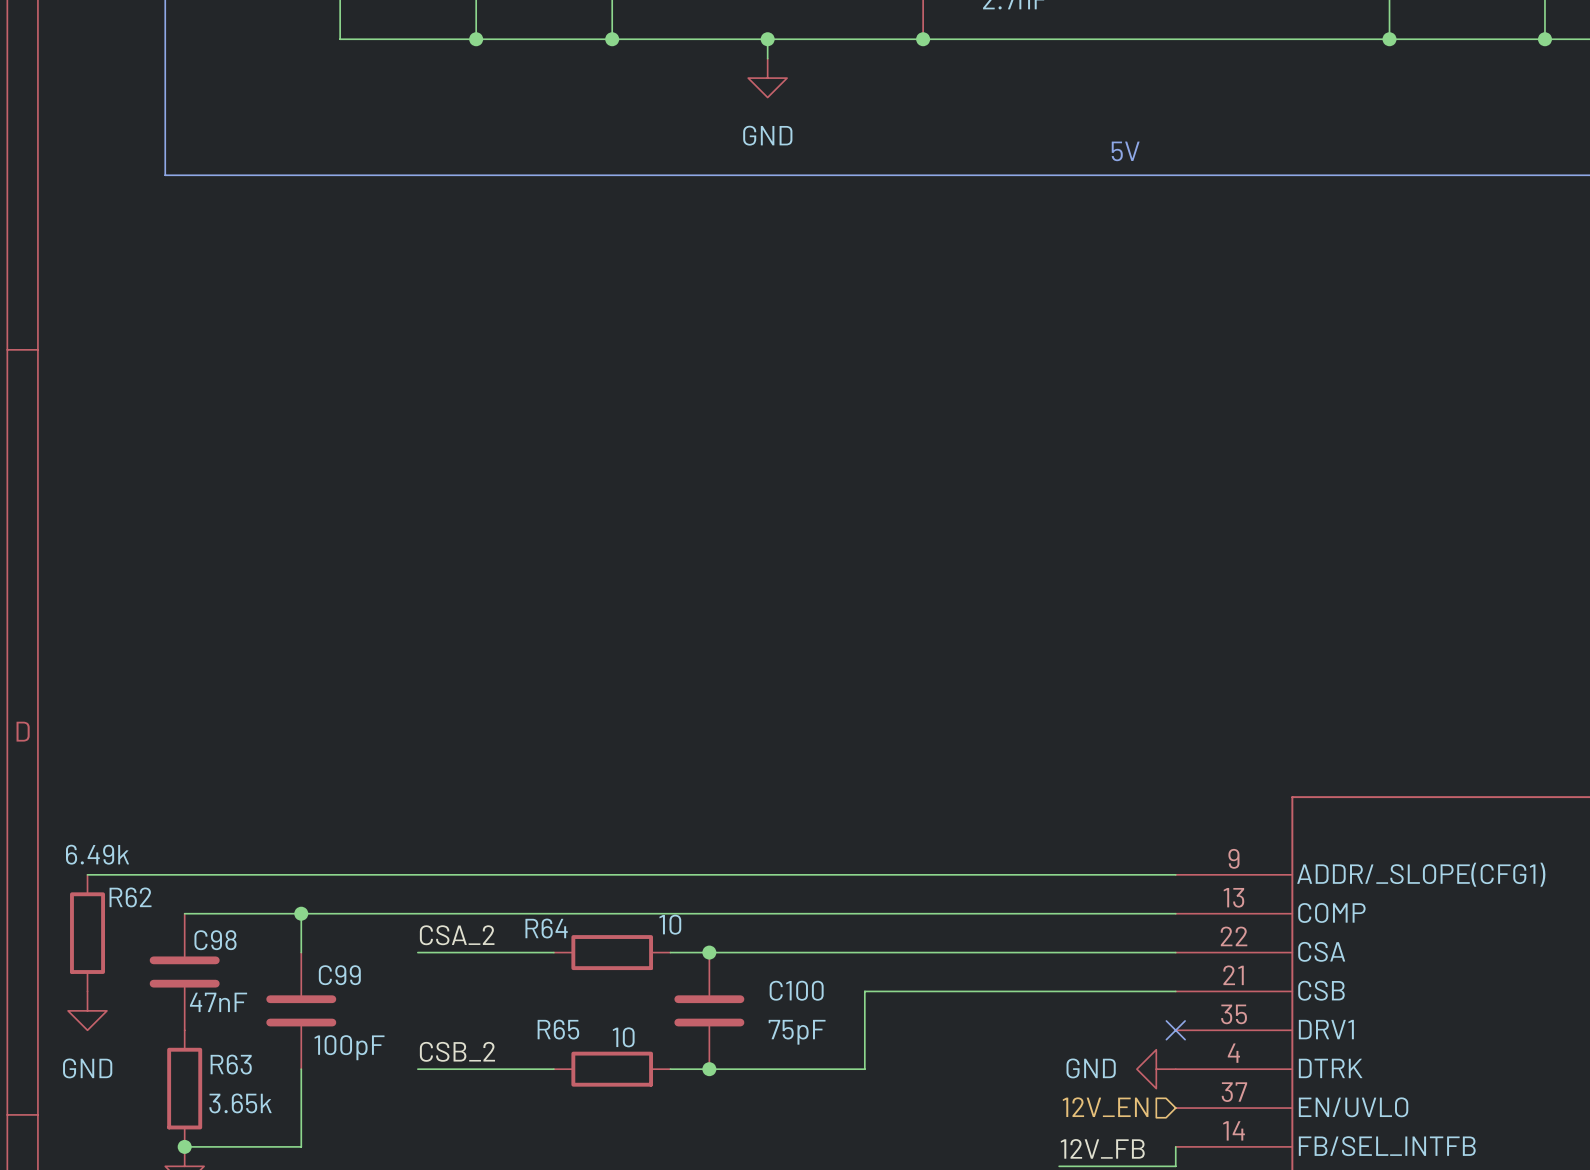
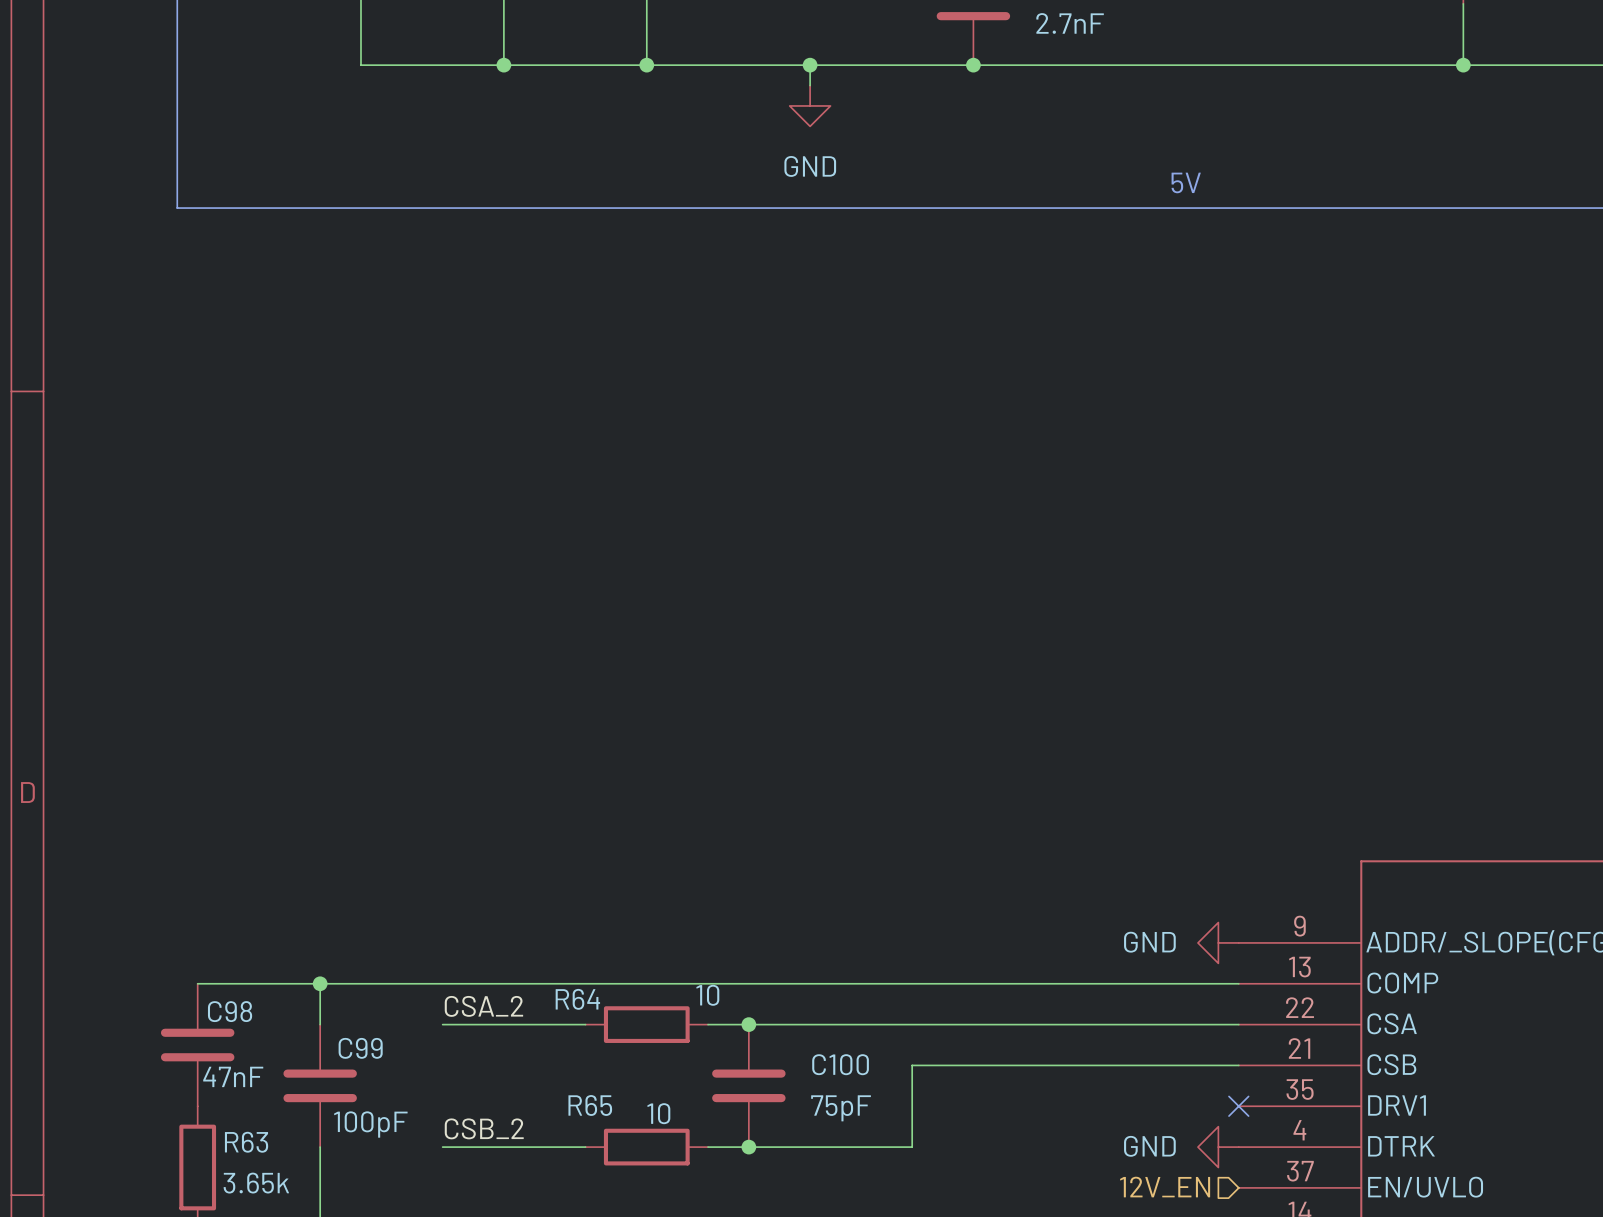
wire: (87, 874) (1175, 874) -> none
power symbol: none -> GND (1218, 942)
R62: 6.49k (87, 933) -> none
power symbol: GND (87, 1010) -> none

